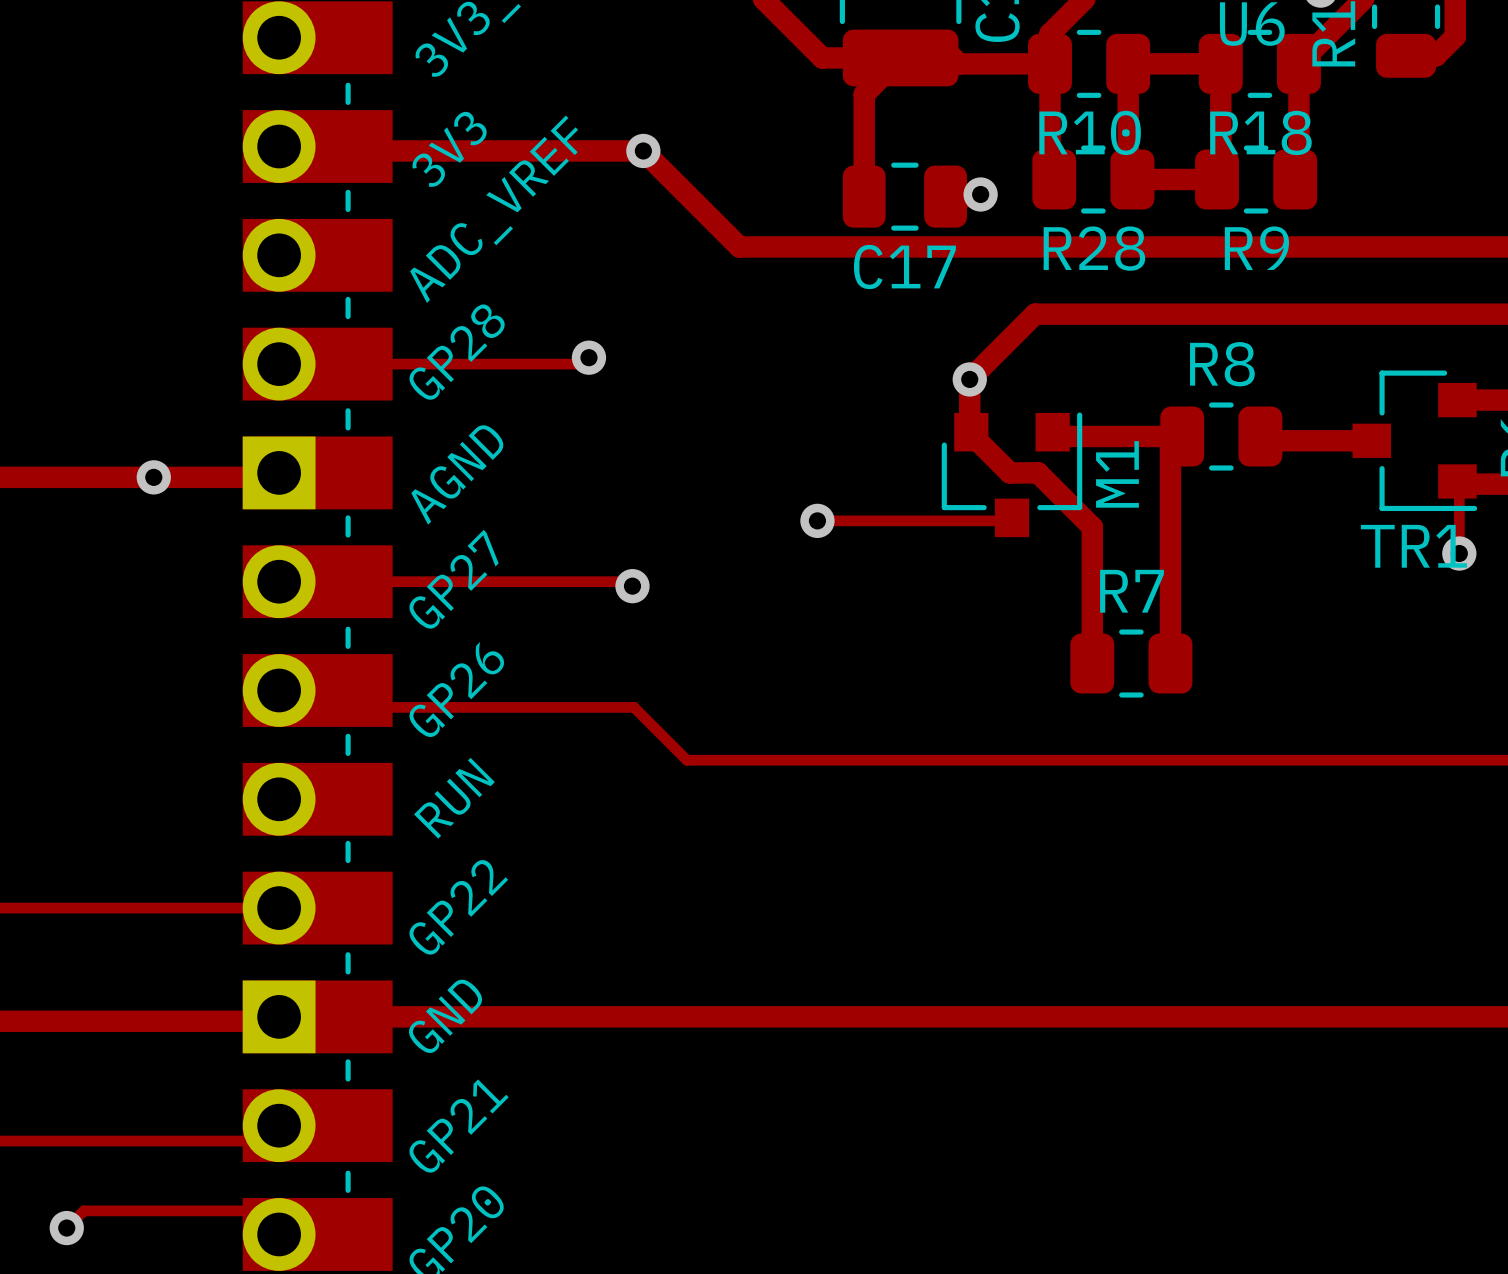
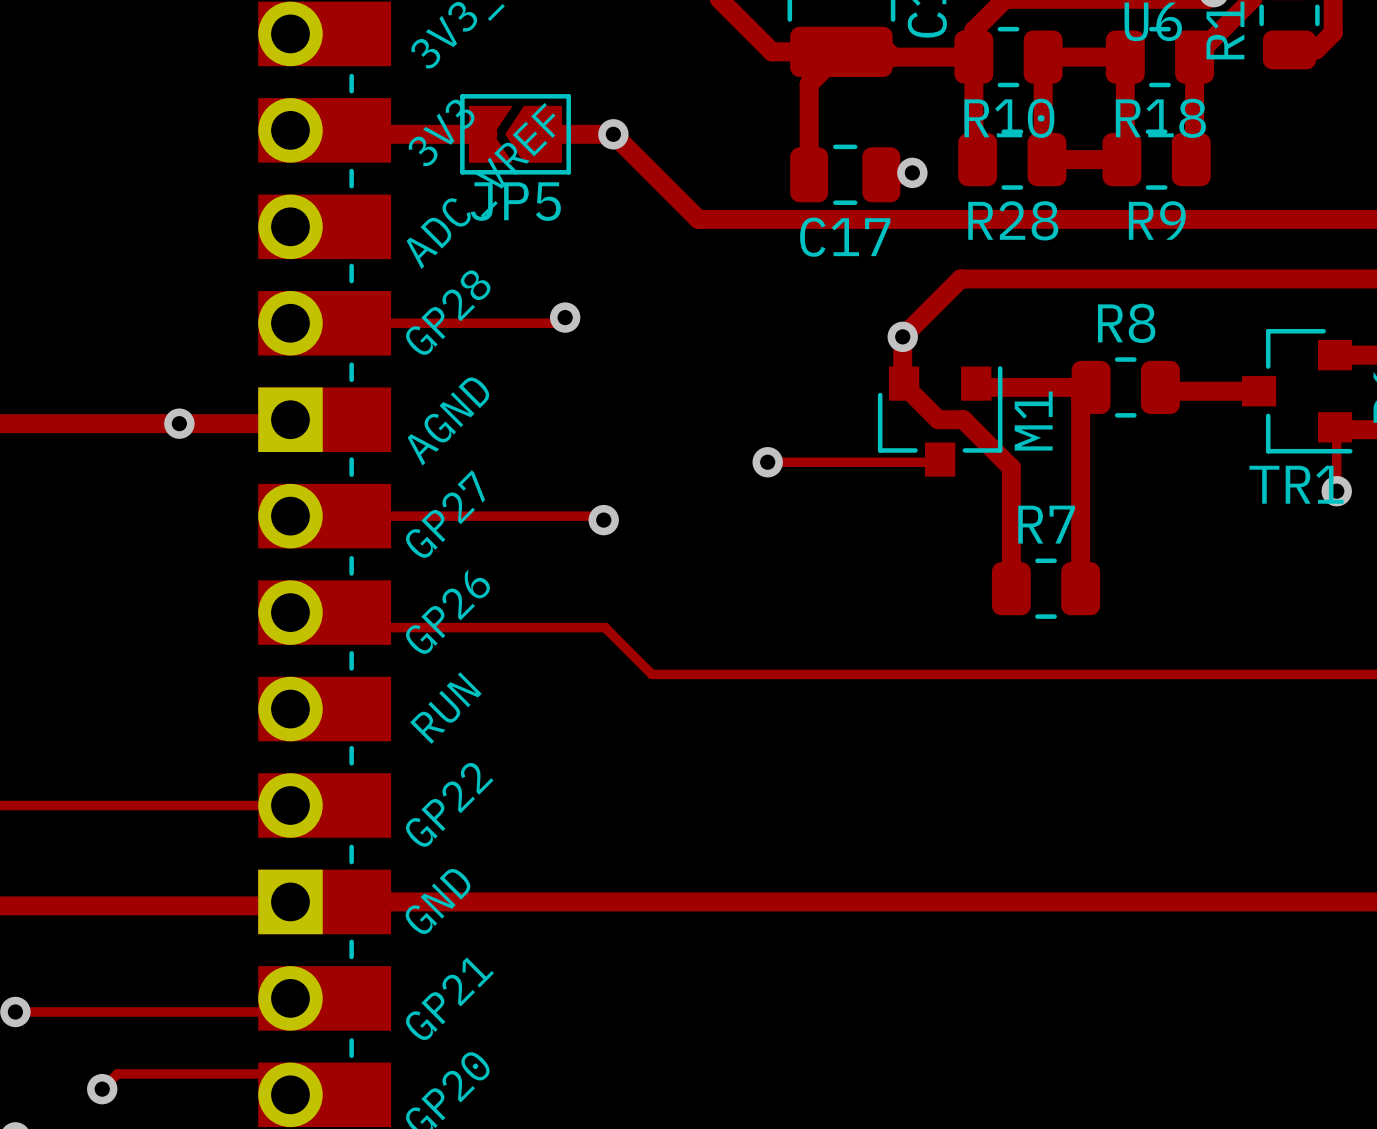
track: (501, 150) (564, 150) -> none
JP5: none -> (515, 134)

